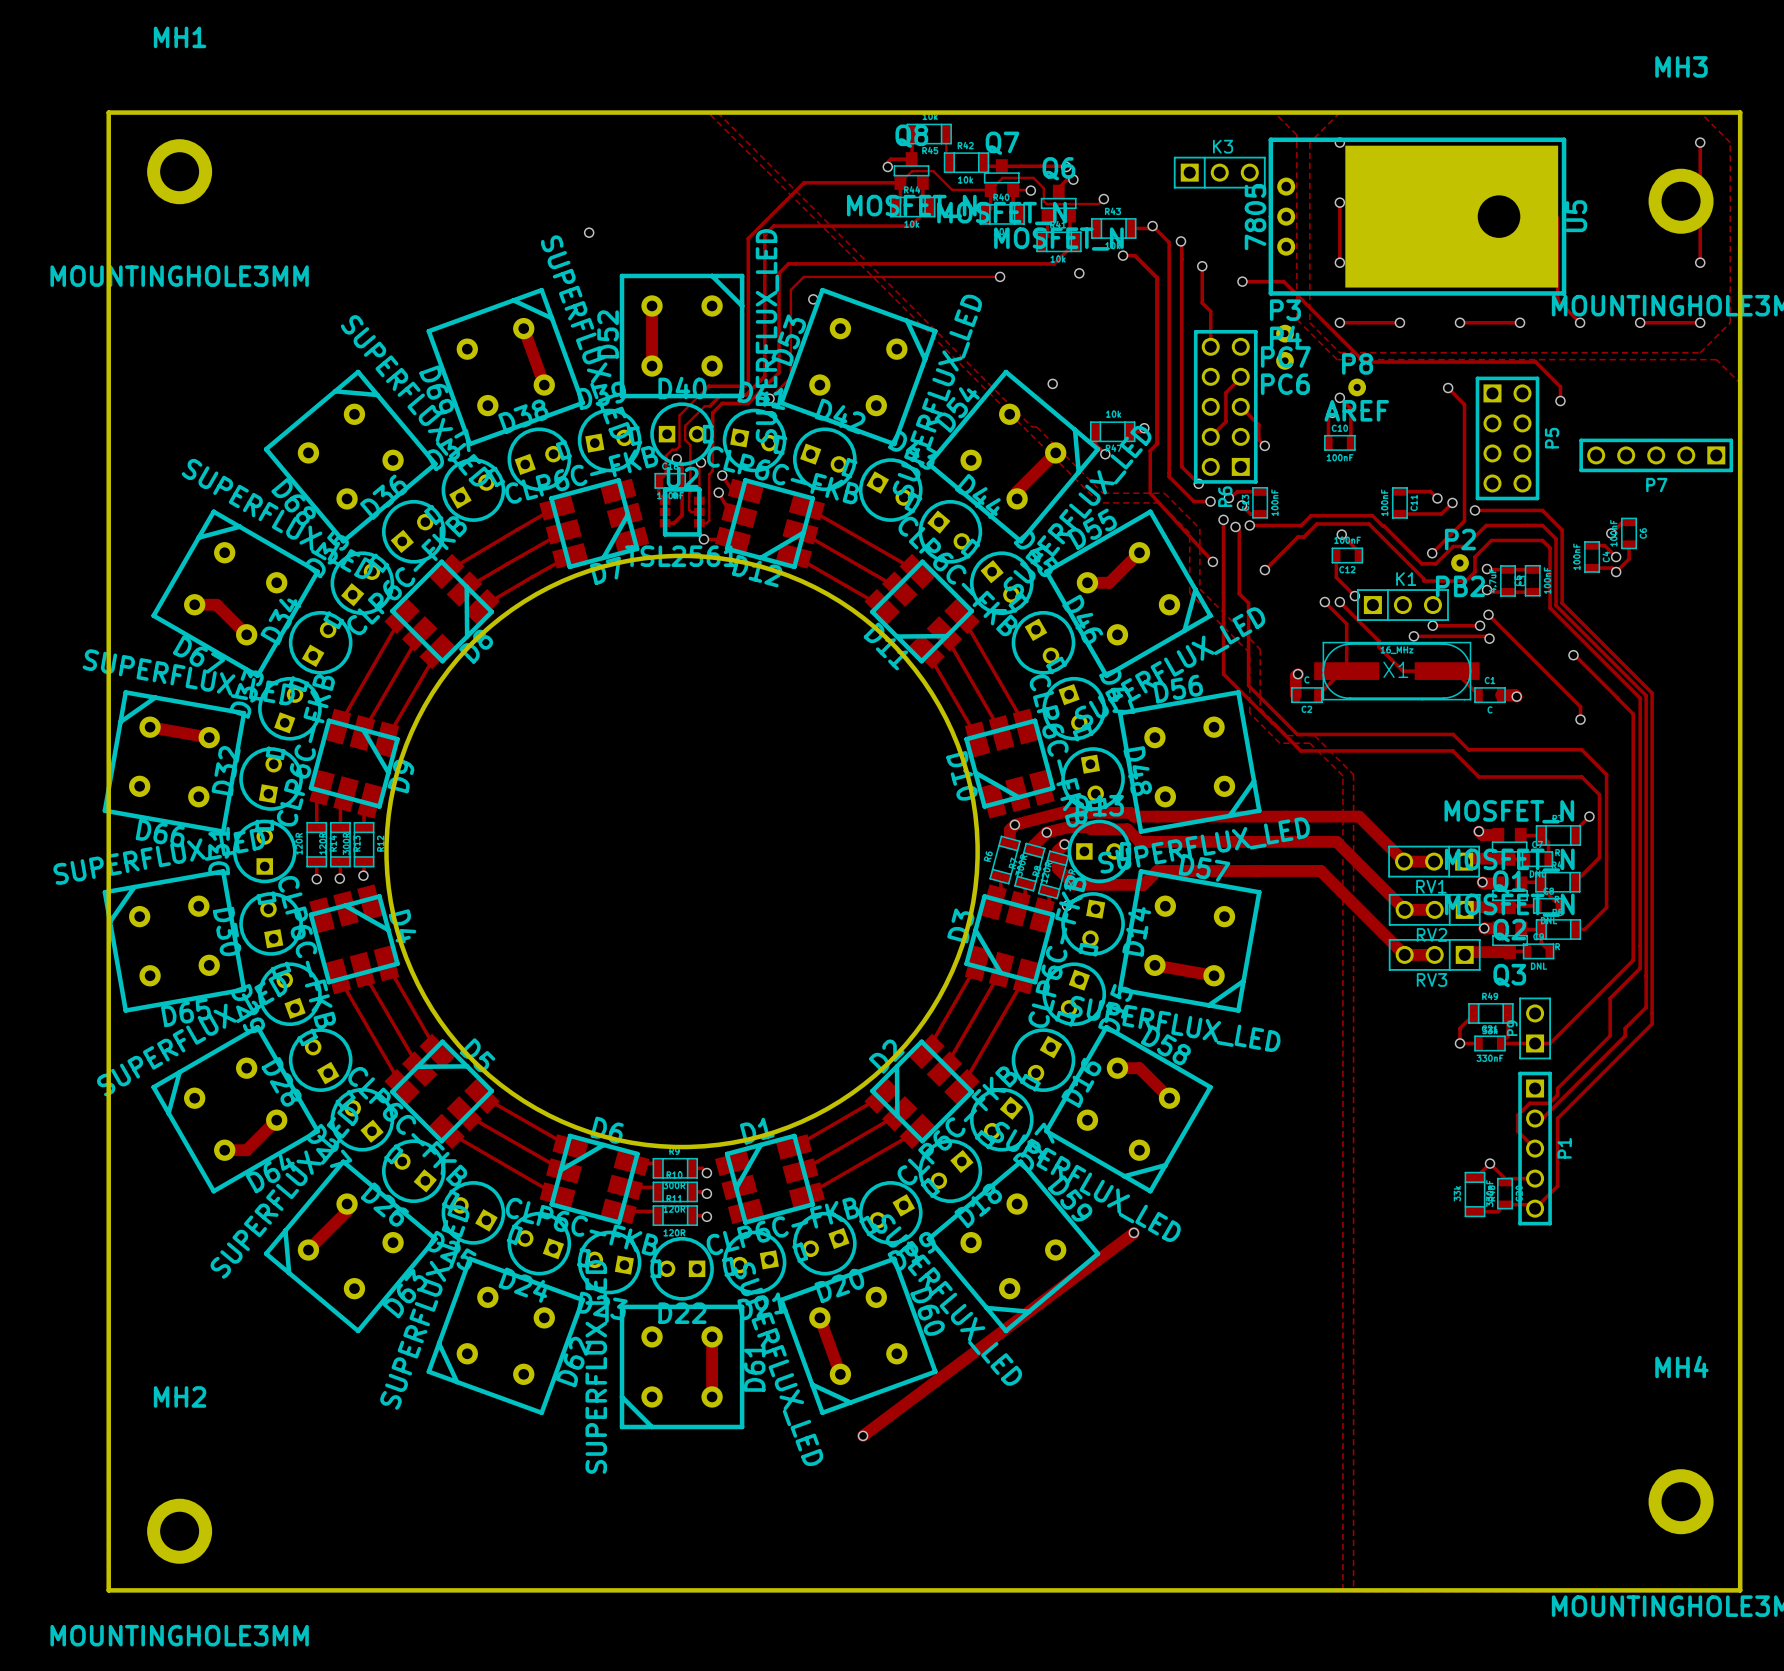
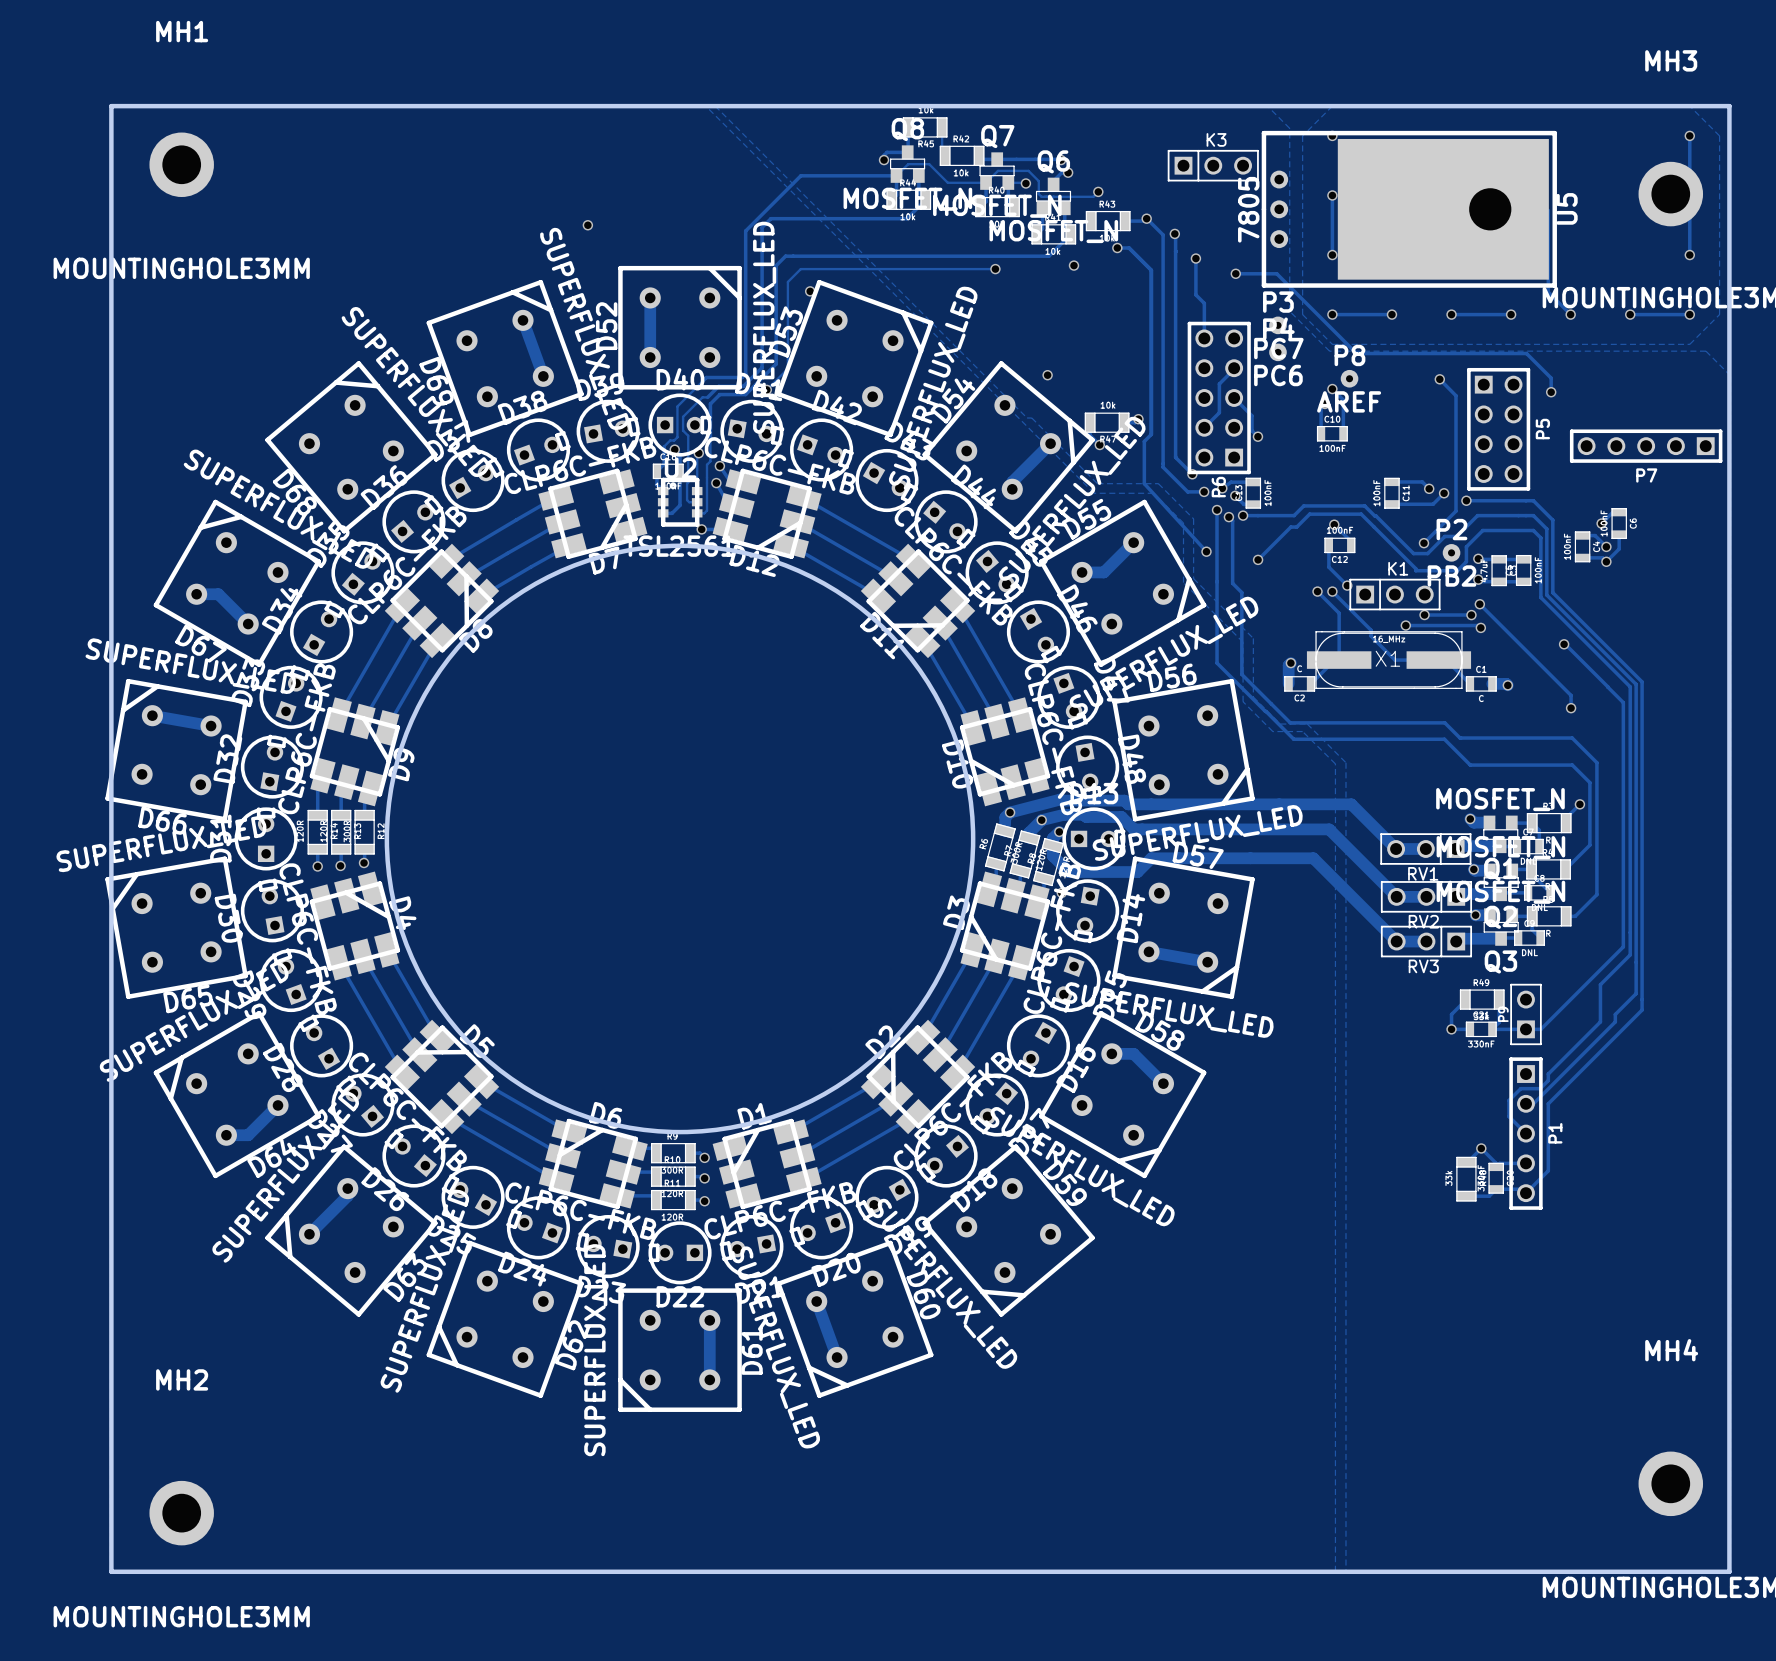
track: (1133, 1232) (863, 1435) -> none
via: (1133, 1232) -> none
via: (863, 1435) -> none

